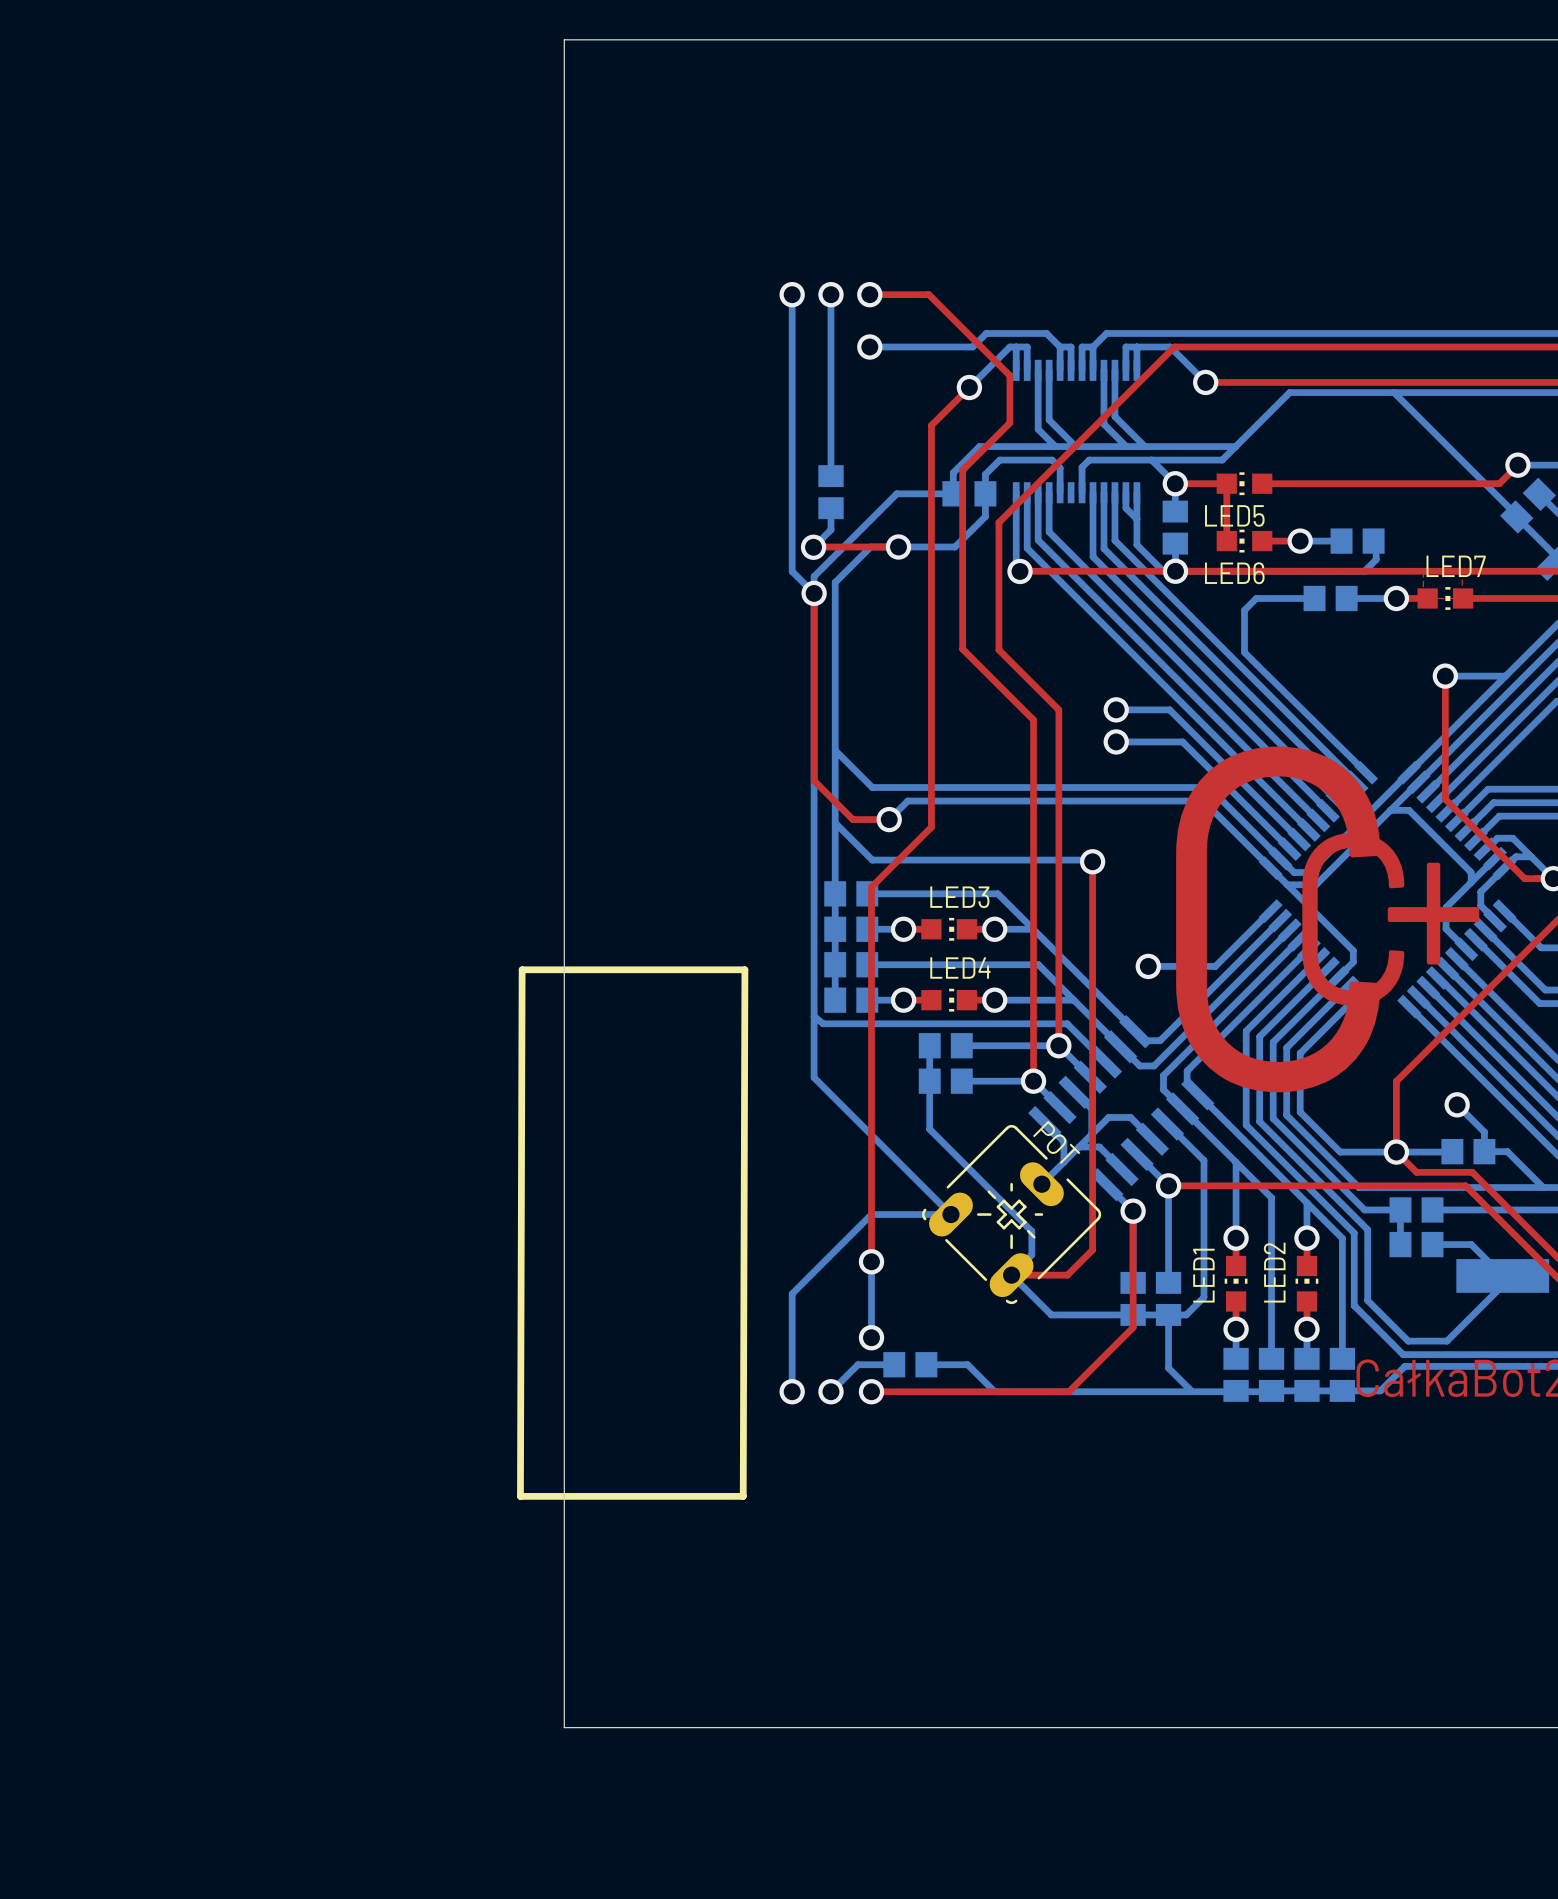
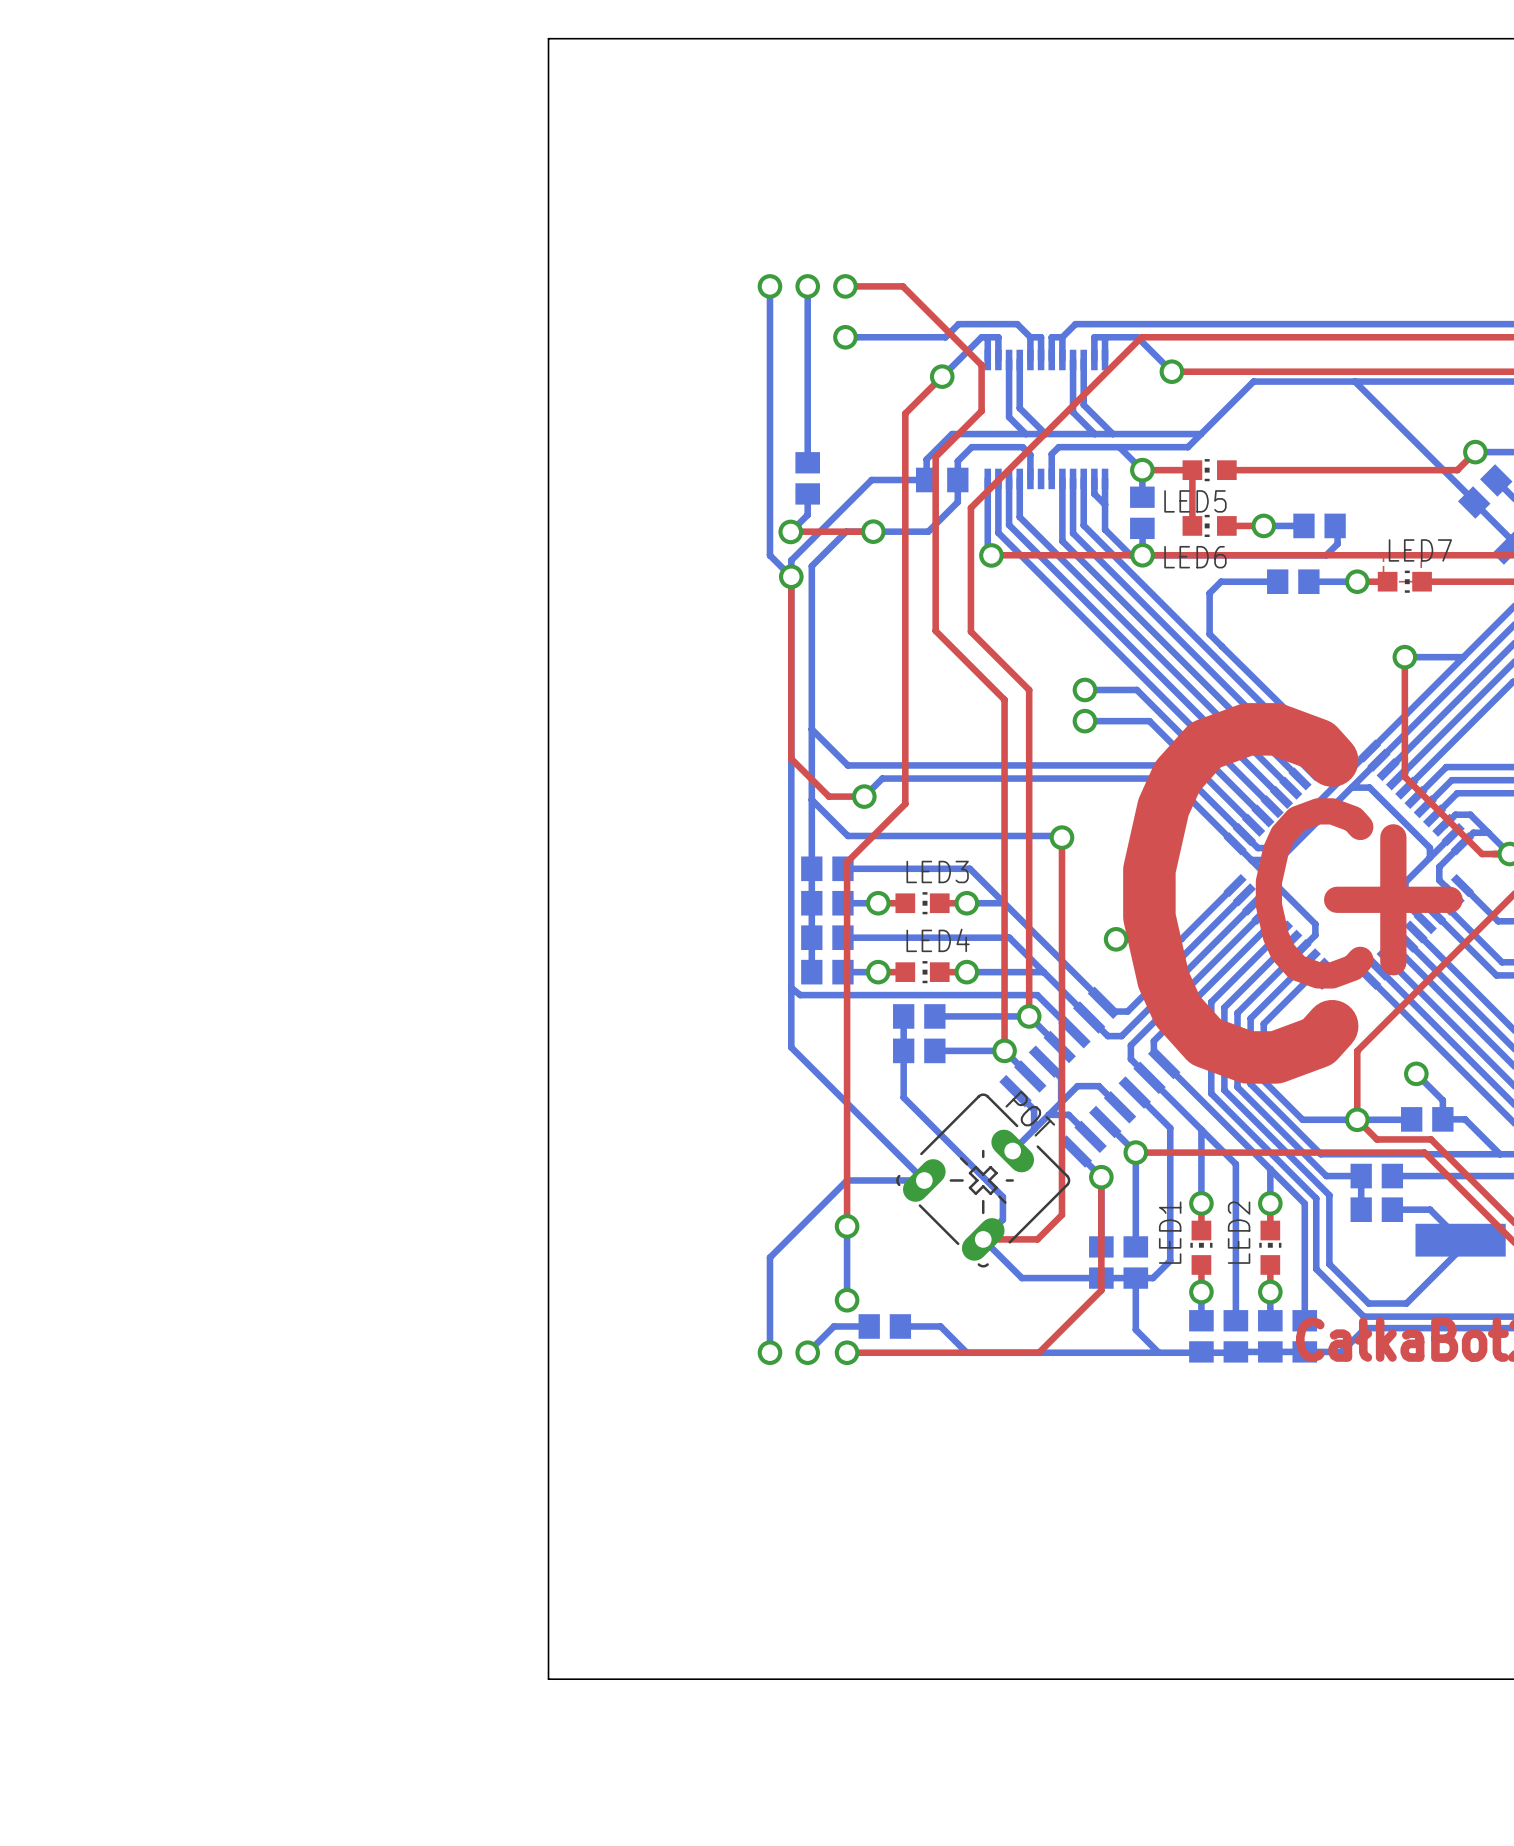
line: (522, 969) (744, 969) (743, 1496) (520, 1496) (522, 969) -> none

